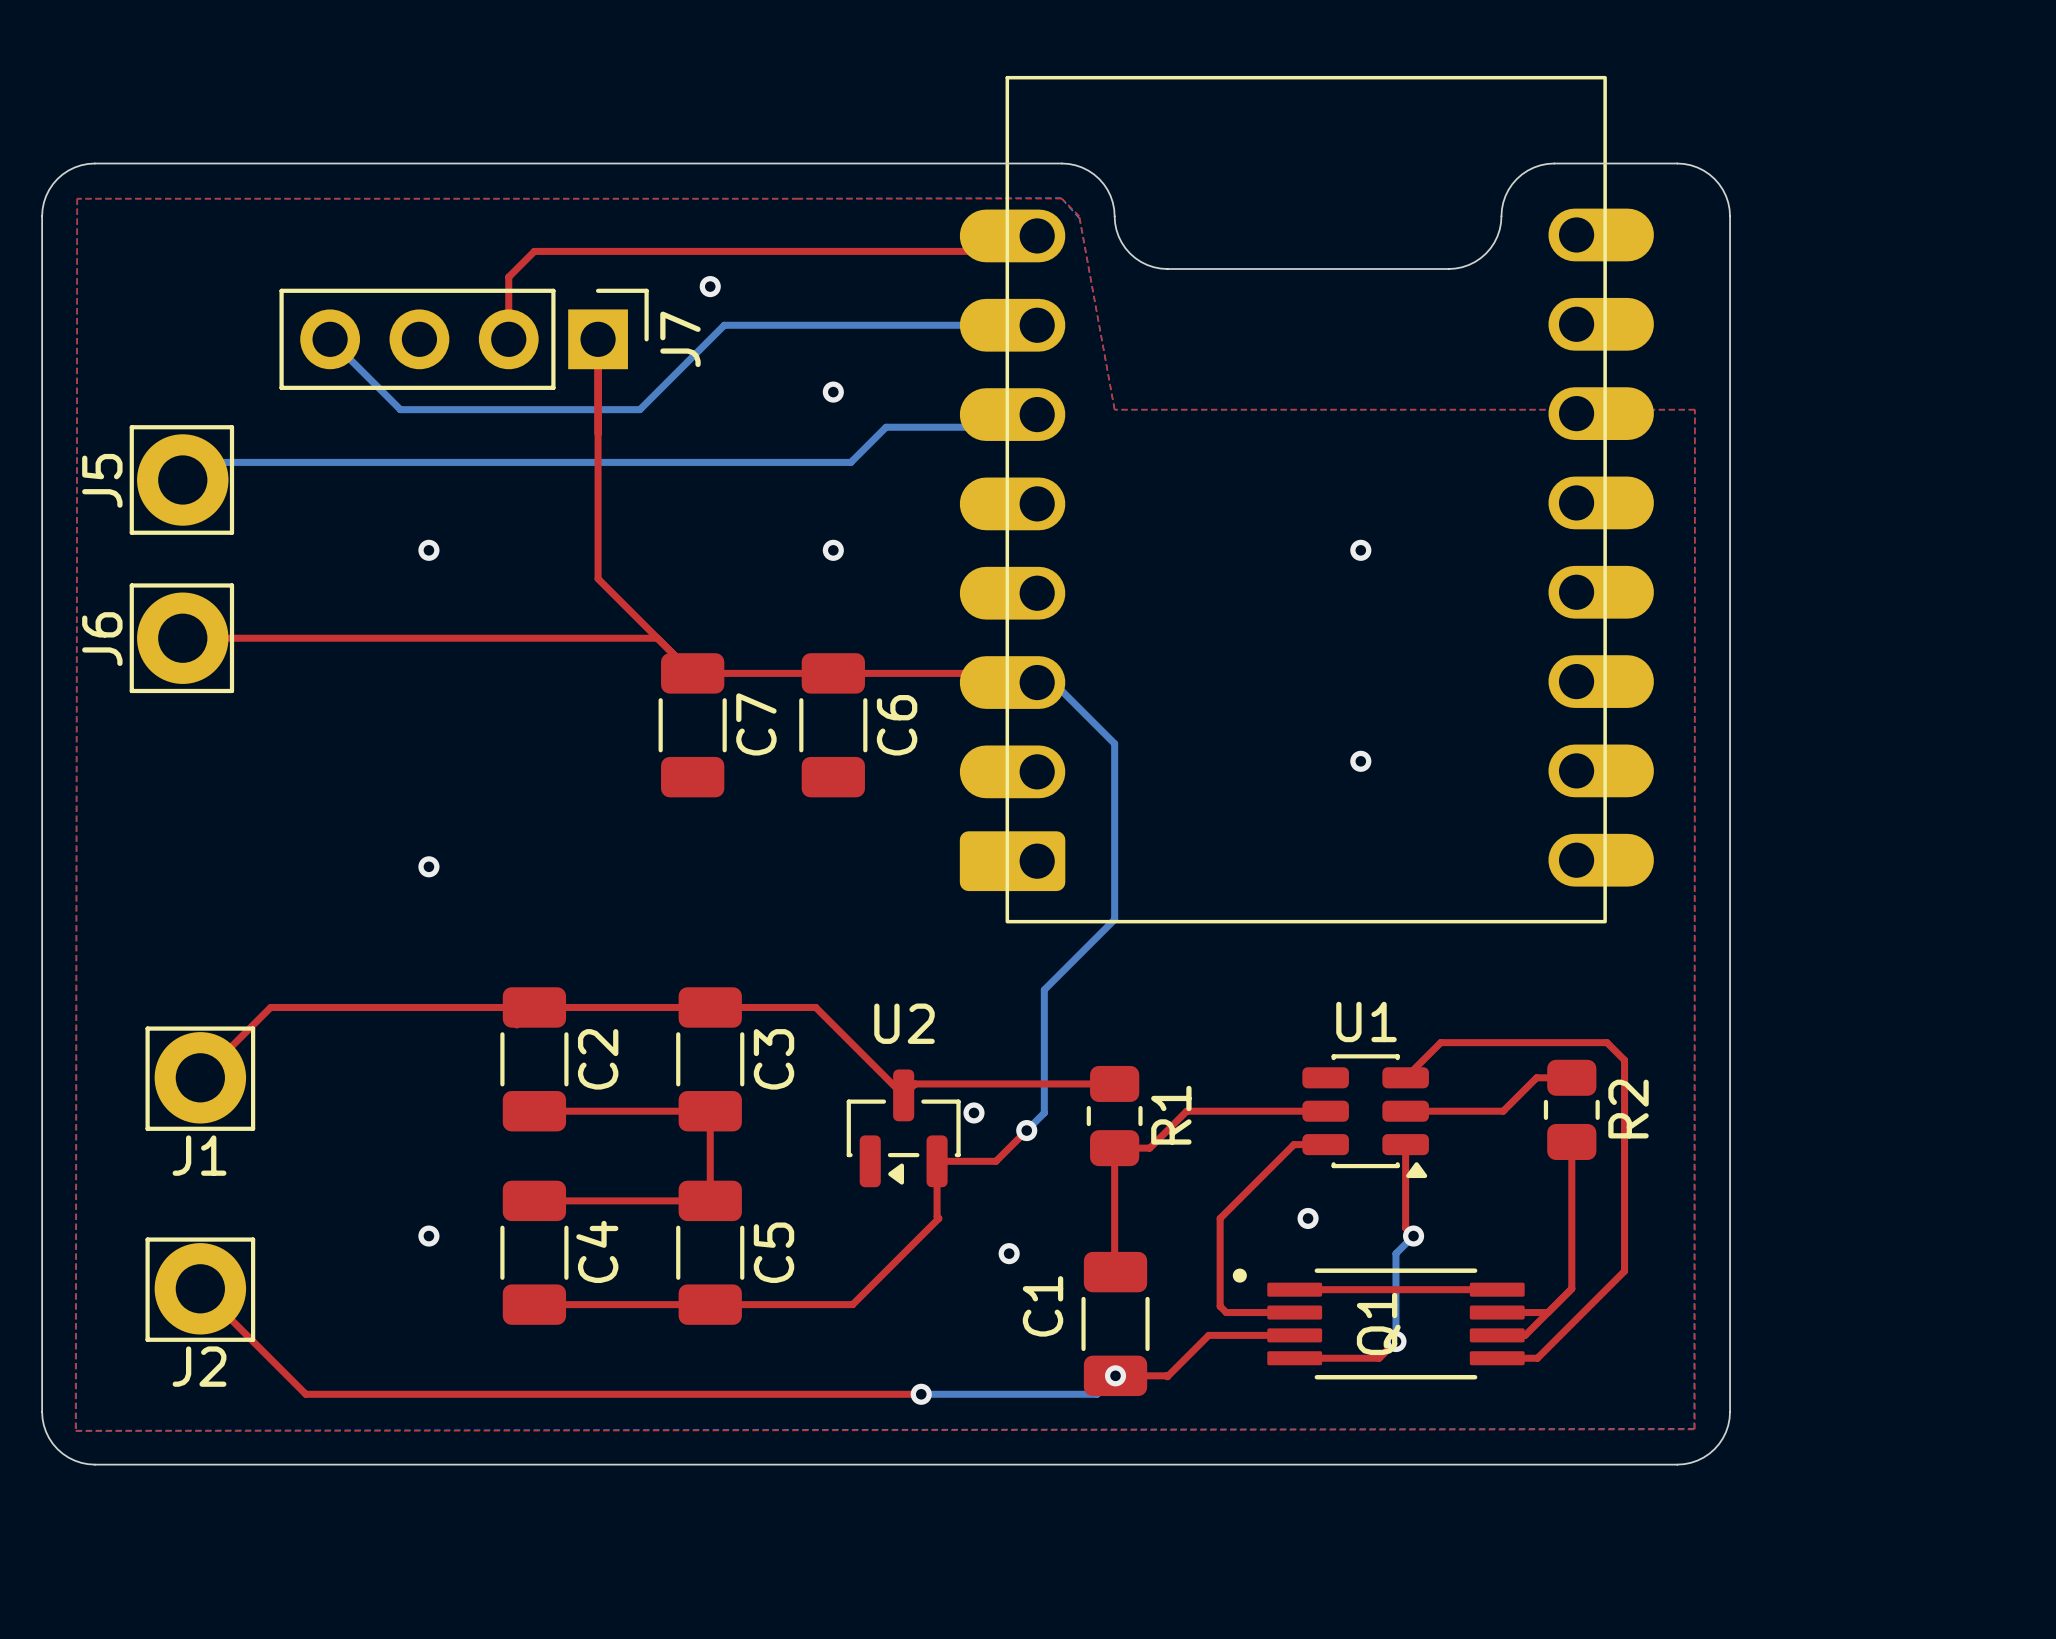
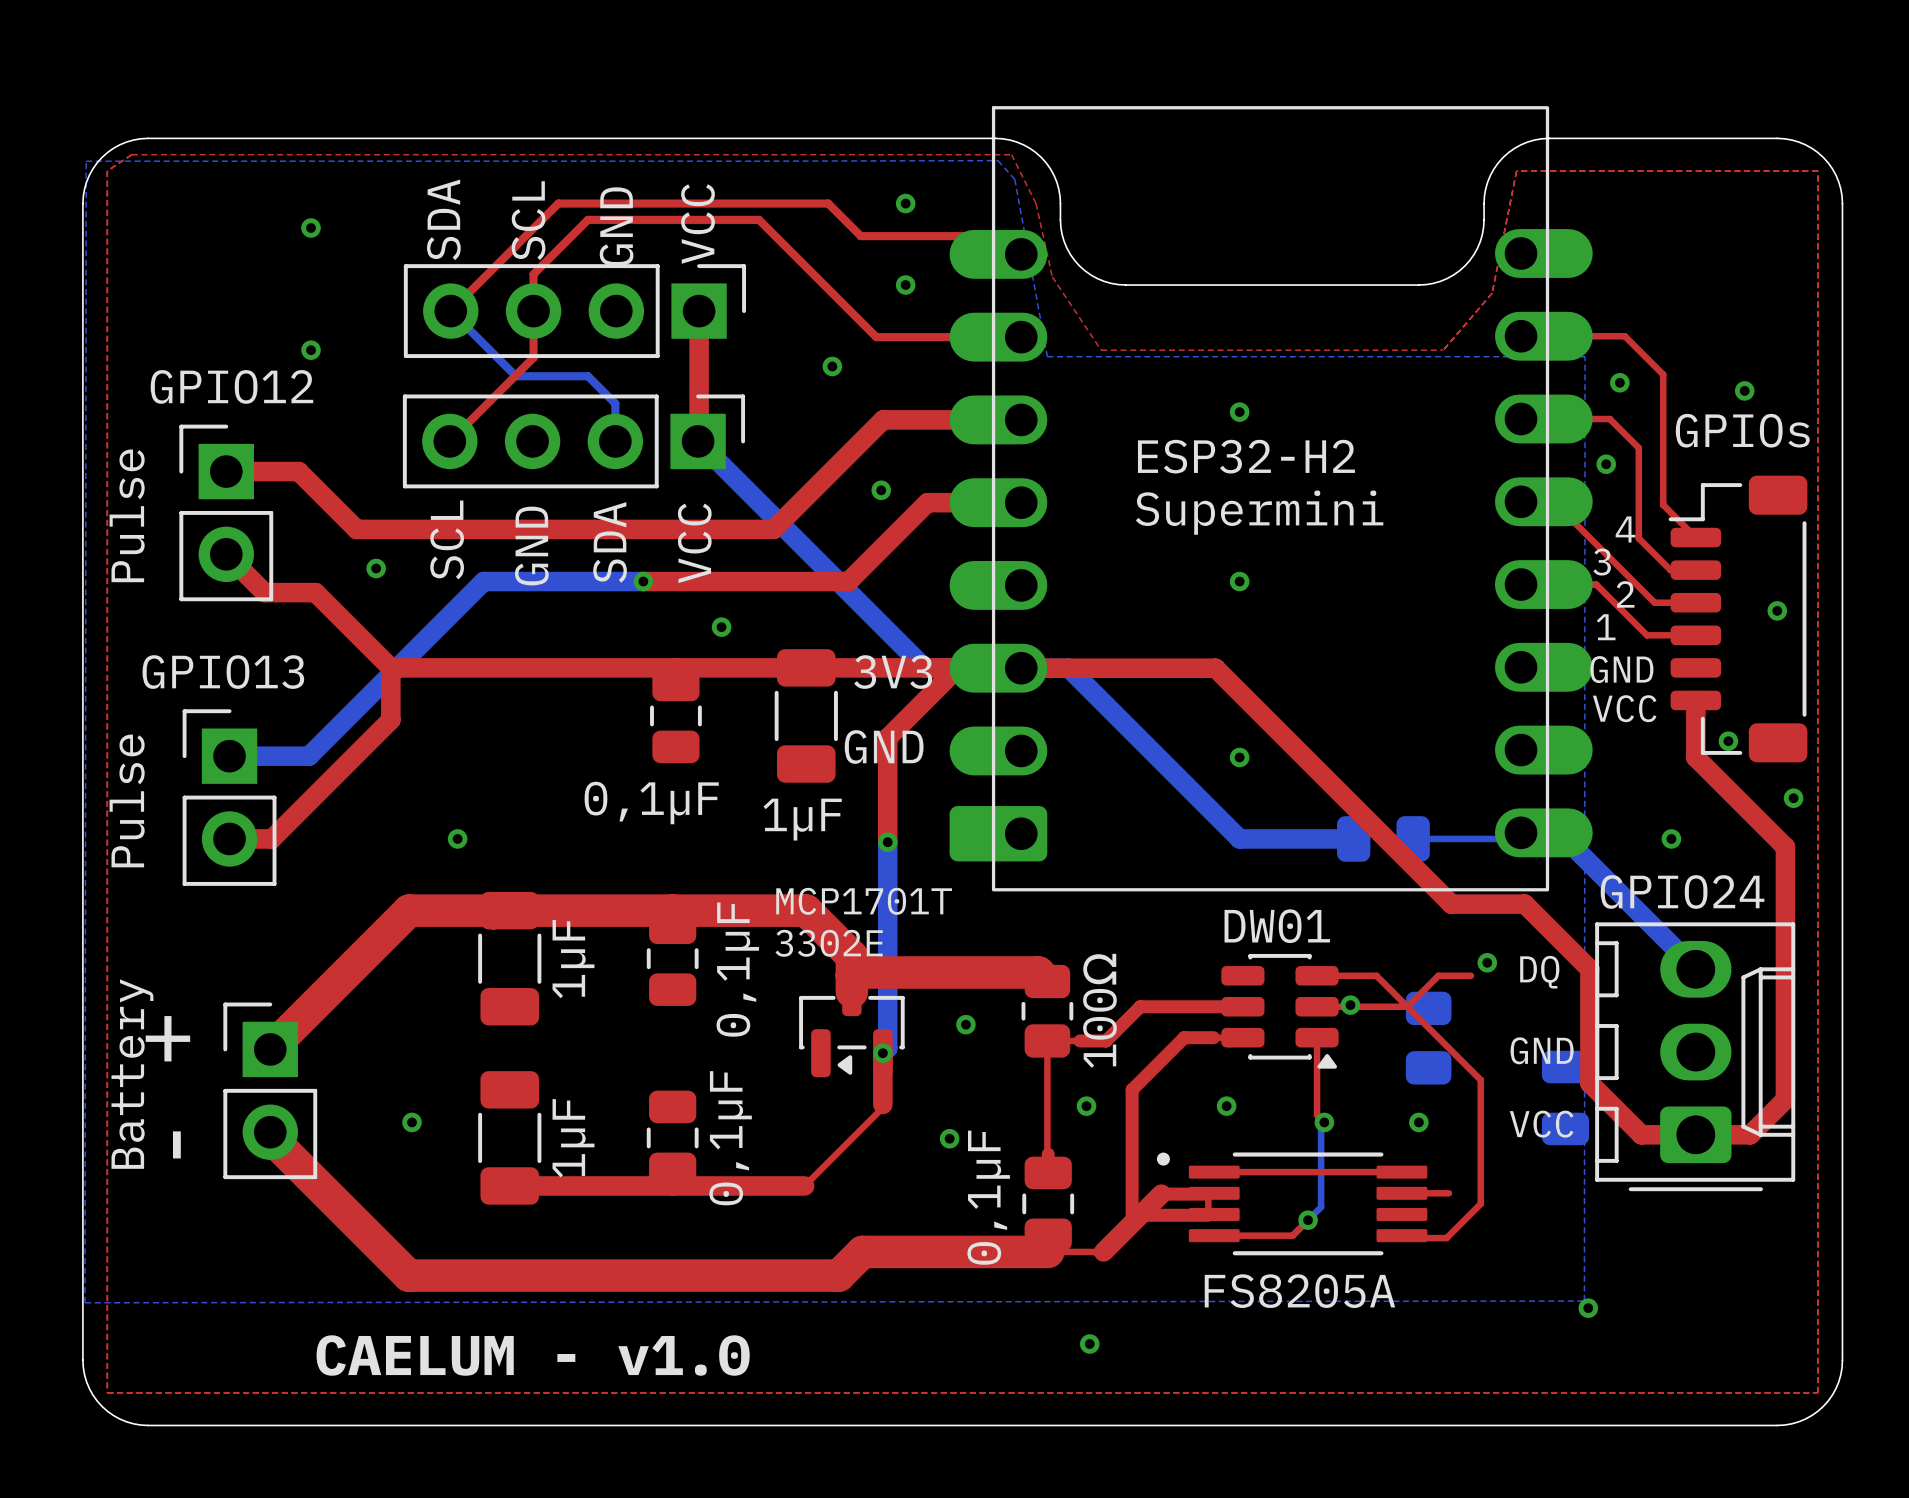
board edge: (94, 163) (1068, 163) (1088, 170) (1103, 184) (1112, 202) (1118, 236) (1130, 253) (1147, 264) (1167, 269) (1455, 268) (1475, 261) (1490, 248) (1499, 229) (1503, 202) (1508, 189) (1516, 178) (1534, 167) (1554, 163) (1677, 163) (1697, 167) (1709, 174) (1722, 189) (1728, 202) (1730, 216) (1730, 1411) (1728, 1425) (1719, 1443) (1709, 1453) (1697, 1460) (1677, 1464) (94, 1464) (81, 1462) (62, 1453) (53, 1443) (46, 1432) (42, 1411) (42, 216) (46, 196) (57, 178) (74, 167) (94, 163) -> (148, 138) (126, 142) (113, 148) (102, 157) (92, 168) (86, 182) (82, 203) (82, 1360) (84, 1374) (89, 1388) (97, 1400) (107, 1411) (126, 1421) (148, 1425) (1777, 1425) (1791, 1423) (1805, 1419) (1817, 1411) (1828, 1400) (1838, 1381) (1842, 1360) (1842, 203) (1840, 189) (1836, 175) (1828, 162) (1817, 152) (1798, 142) (1777, 138) (1549, 138) (1534, 140) (1520, 144) (1508, 152) (1494, 168) (1485, 189) (1483, 227) (1477, 248) (1469, 260) (1459, 270) (1440, 281) (1418, 285) (1125, 285) (1111, 283) (1097, 278) (1084, 270) (1074, 260) (1066, 248) (1062, 234) (1058, 189) (1050, 168) (1041, 157) (1029, 148) (1016, 142) (1002, 138) (148, 138)
top zone outline: (77, 198) (75, 1431) (1694, 1429) (1694, 409) (1114, 409) (1079, 216) (1061, 198) (77, 198) -> (131, 154) (107, 170) (107, 1392) (1818, 1392) (1818, 170) (1516, 170) (1492, 293) (1443, 350) (1101, 350) (1052, 276) (1036, 203) (1011, 154) (131, 154)
top track: (1037, 235) (1021, 251) (534, 251) (508, 277) (508, 339) -> none
via: none -> (905, 203)
text: none -> SDA (443, 219)
text: none -> SCL (528, 220)
text: none -> GND (616, 226)
text: none -> VCC (698, 224)
via: none -> (311, 227)
via: (710, 286) -> none
top track: none -> (1021, 254) (1013, 254) (994, 236) (860, 236) (828, 203) (558, 203) (450, 311)
bottom track: (1037, 325) (724, 325) (639, 409) (400, 409) (330, 339) -> none
via: none -> (905, 285)
J7: (464, 339) -> none
top track: (598, 339) (598, 578) (692, 673) (1028, 673) (1037, 682) -> none
bottom track: none -> (450, 311) (515, 376) (587, 376) (615, 403) (615, 441)
part: none -> (574, 311)
top track: none -> (699, 311) (698, 441)
top track: none -> (1521, 336) (1624, 336) (1663, 374) (1663, 504) (1695, 537)
top track: none -> (1021, 337) (876, 337) (759, 219) (587, 219) (533, 274) (533, 357) (449, 441)
via position: (833, 392) -> (832, 366)
via: none -> (311, 350)
bottom track: (1037, 414) (1024, 427) (886, 427) (850, 462) (200, 462) (182, 479) -> none
via: none -> (1619, 382)
text: none -> GPIO12 (231, 386)
via: none -> (1744, 390)
via: none -> (1239, 412)
top track: none -> (1521, 419) (1609, 419) (1638, 447) (1638, 538) (1670, 570) (1695, 570)
top track: none -> (1021, 419) (883, 419) (773, 529) (356, 529) (298, 471) (226, 471)
J5: (181, 479) -> none
text: none -> GPIOs (1742, 430)
part position: (1306, 499) -> (1271, 498)
part: none -> (573, 441)
bottom track: none -> (698, 441) (924, 668) (1068, 668) (1239, 838) (1353, 838)
text: none -> ESP32-H2 (1246, 456)
via: none -> (1606, 464)
via: (428, 550) -> none
via: (833, 550) -> none
via: (1360, 550) -> none
via: none -> (881, 490)
top track: none -> (1521, 501) (1553, 501) (1654, 602) (1695, 602)
top track: none -> (1021, 502) (927, 502) (848, 581) (643, 581)
part: none -> (226, 512)
text: none -> Supermini (1259, 512)
text: none -> Pulse (127, 515)
text: none -> 4 (1625, 529)
text: none -> SCL (447, 539)
text: none -> SDA (610, 542)
text: none -> GND (531, 546)
text: none -> VCC (694, 543)
top track: none -> (226, 554) (264, 592) (315, 592) (390, 667)
text: none -> 3 (1602, 562)
J6: (181, 638) -> none
top track: (182, 638) (657, 638) -> none
via: none -> (376, 568)
bottom track: none -> (643, 581) (483, 581) (309, 756) (229, 756)
via: none -> (643, 581)
via: none -> (1239, 581)
top track: none -> (1521, 584) (1596, 584) (1646, 635) (1695, 635)
text: none -> 2 (1625, 594)
bottom track: (1037, 682) (1053, 682) (1114, 743) (1114, 919) (1044, 989) (1044, 1112) (1026, 1130) -> none
via: none -> (1777, 610)
part: none -> (1738, 619)
via: none -> (721, 627)
text: none -> 1 (1606, 627)
C7: (692, 725) -> none
C6: (833, 725) -> none
top track: none -> (390, 667) (390, 720) (271, 838) (229, 838)
top track: none -> (390, 667) (1020, 667)
text: none -> GND (1621, 669)
text: none -> GPIO13 (223, 672)
text: none -> 3V3 (893, 672)
via: (1360, 761) -> none
top track: none -> (1695, 700) (1695, 757) (1785, 847) (1785, 1099) (1750, 1134) (1641, 1134) (1589, 1083) (1589, 969) (1524, 904) (1451, 904) (1215, 668) (957, 668) (887, 737) (887, 842)
text: none -> VCC (1624, 708)
0,1µF: none -> (675, 715)
1µF: none -> (806, 715)
via: none -> (1728, 741)
text: none -> GND (884, 746)
via: none -> (1239, 757)
via position: (428, 866) -> (457, 838)
part: none -> (229, 797)
via: none -> (1793, 798)
text: none -> Pulse (127, 800)
part: none -> (1383, 838)
bottom track: none -> (1413, 838) (1514, 838) (1521, 832) (1559, 832) (1695, 969)
via: none -> (1671, 838)
bottom track: none -> (887, 842) (887, 1048) (882, 1053)
via: none -> (887, 842)
text: none -> GPIO24 (1682, 891)
text: none -> MCP1701T (864, 901)
top track: (425, 1007) (270, 1007) (200, 1077) -> (409, 910) (270, 1049)
top track width: thin (425, 1007) (815, 1007) -> thick (409, 910) (770, 910)
top track: (815, 1007) (903, 1095) (915, 1083) (1114, 1083) -> (851, 975) (855, 972) (1038, 972) (1047, 981)
top track: none -> (770, 910) (806, 910) (851, 956) (851, 992)
U1 name: U1 (1366, 1021) -> none
U2 name: U2 (904, 1023) -> none
text: none -> DW01 (1277, 926)
text: none -> 3302E (829, 943)
C2 name: C2 (598, 1059) -> 1µF (573, 959)
C3: (710, 1059) -> none
0,1µF: none -> (672, 958)
via: none -> (1487, 962)
text: none -> DQ (1539, 972)
top track: (1405, 1077) (1440, 1042) (1606, 1042) (1624, 1060) (1624, 1271) (1537, 1358) (1497, 1358) -> (1317, 975) (1376, 975) (1480, 1080) (1480, 1203) (1446, 1238) (1389, 1238)
J1: (200, 1078) -> none
via: none -> (1350, 1005)
R2 side: top (1571, 1109) -> bottom (1428, 1038)
top track: (534, 1111) (710, 1111) (710, 1200) (534, 1200) -> none
top track: (1214, 1111) (1186, 1111) (1149, 1148) -> (1140, 1006) (1106, 1040) (1079, 1040)
top track width: thin (1214, 1111) (1325, 1111) -> thick (1140, 1006) (1242, 1006)
via position: (973, 1112) -> (882, 1053)
R1 name: R1 (1171, 1115) -> 100Ω (1099, 1010)
top track: (1026, 1130) (995, 1161) (937, 1161) -> none
top track: (1571, 1141) (1571, 1288) (1525, 1335) (1497, 1335) -> none
top track: (1293, 1144) (1220, 1218) (1220, 1306) (1226, 1312) (1294, 1312) -> (1213, 1037) (1184, 1037) (1132, 1089) (1132, 1223) (1103, 1251)
text: none -> + (167, 1038)
text: none -> GND (1542, 1050)
top track width: thin (937, 1161) (937, 1216) -> thick (882, 1053) (882, 1104)
part: none -> (1695, 1056)
text: none -> Battery (132, 1074)
part: none -> (270, 1090)
part: none -> (1565, 1097)
via: none -> (1086, 1106)
via: none -> (1418, 1122)
text: none -> VCC (1541, 1124)
bottom track: (1410, 1239) (1395, 1253) (1395, 1341) -> (1321, 1125) (1321, 1207) (1293, 1234)
text: none -> - (176, 1144)
C4 name: C4 (597, 1251) -> 1µF (573, 1138)
C5: (710, 1252) -> none
0,1µF: none -> (672, 1137)
top track: none -> (271, 1138) (408, 1275) (838, 1275) (862, 1251) (1048, 1251)
top track: (200, 1288) (305, 1394) (921, 1394) -> none
J2: (200, 1289) -> none
top track width: thin (534, 1304) (852, 1304) -> thick (509, 1185) (804, 1185)
C1: (1115, 1323) -> none
0,1µF: none -> (1048, 1203)
Q1 name: Q1 (1378, 1323) -> none
bottom track: (1115, 1375) (1097, 1394) (921, 1394) -> none
via: (1115, 1375) -> none
top track: none -> (1103, 1251) (1140, 1215) (1208, 1215) (1208, 1194) (1161, 1194) (1103, 1251)
via: (921, 1394) -> none
text: none -> FS8205A (1299, 1291)
via: none -> (1588, 1308)
via: none -> (1089, 1344)
text: none -> CAELUM - v1.0 (533, 1355)

